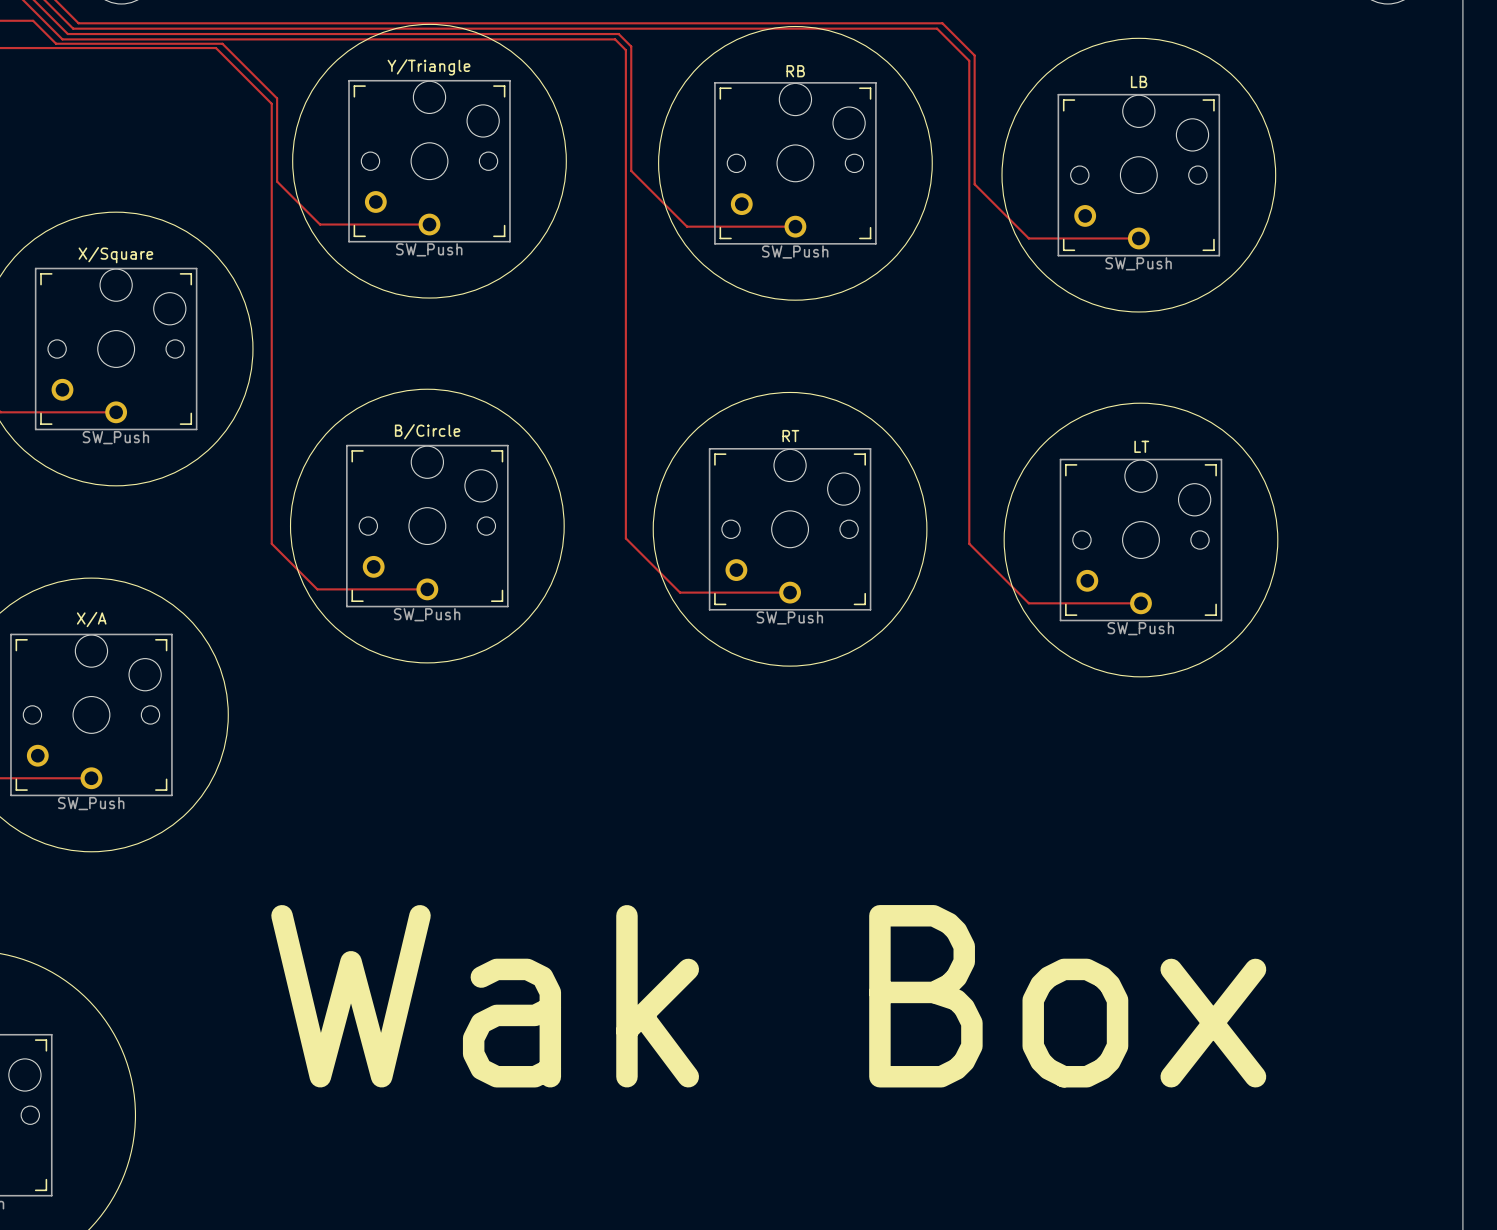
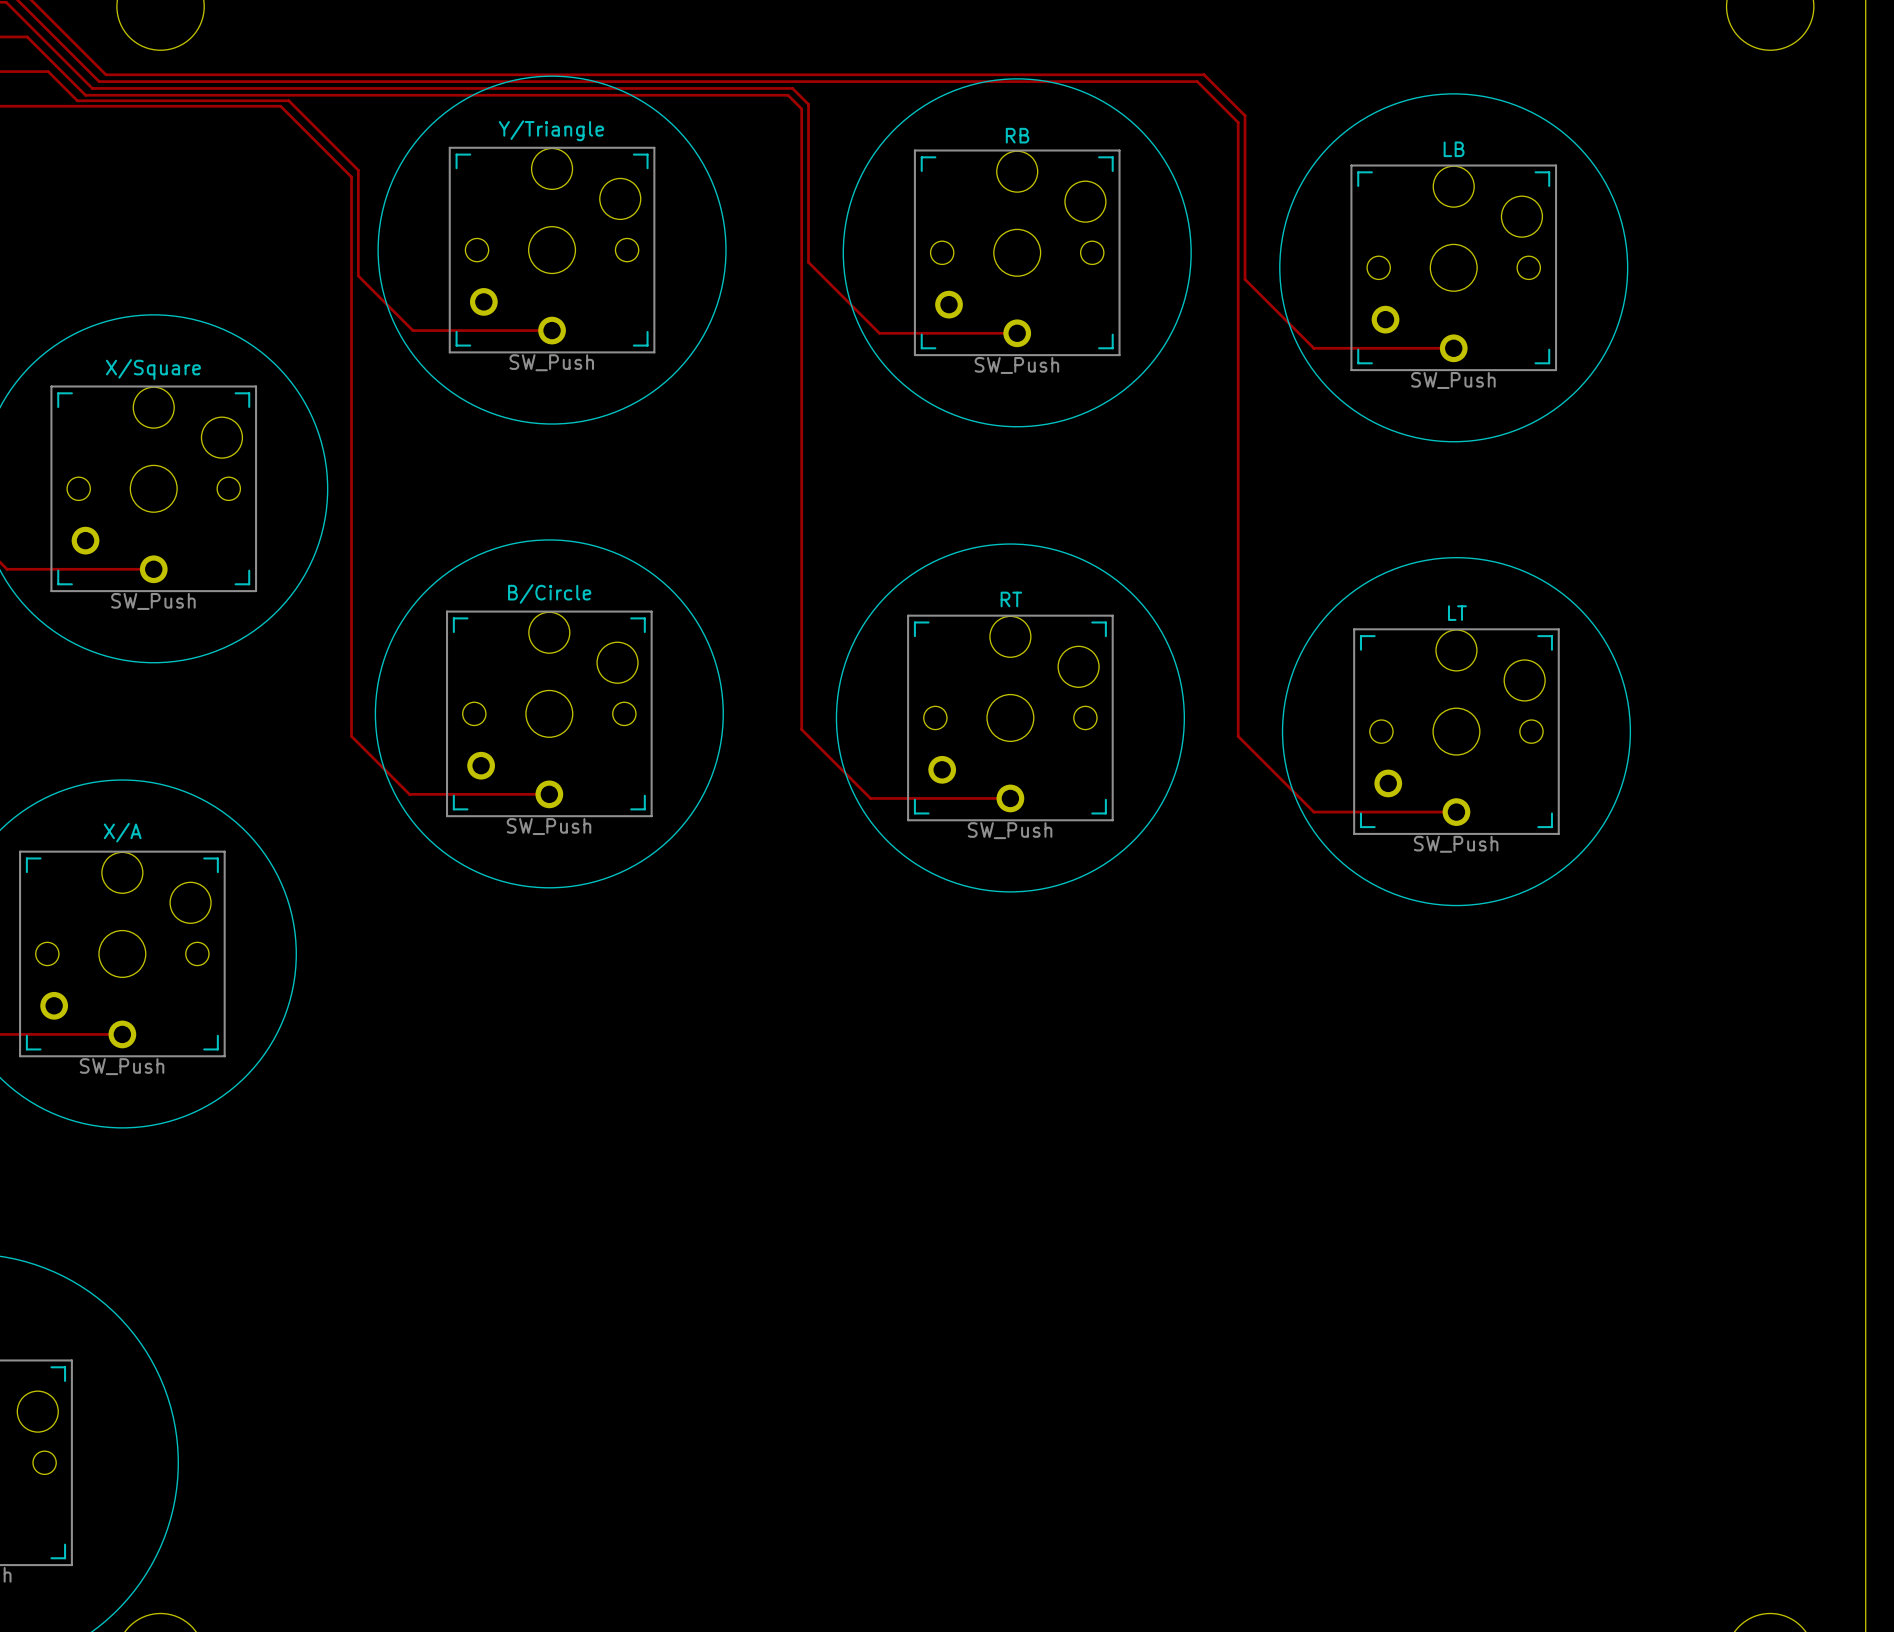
text: Wak Box (768, 996) -> none

